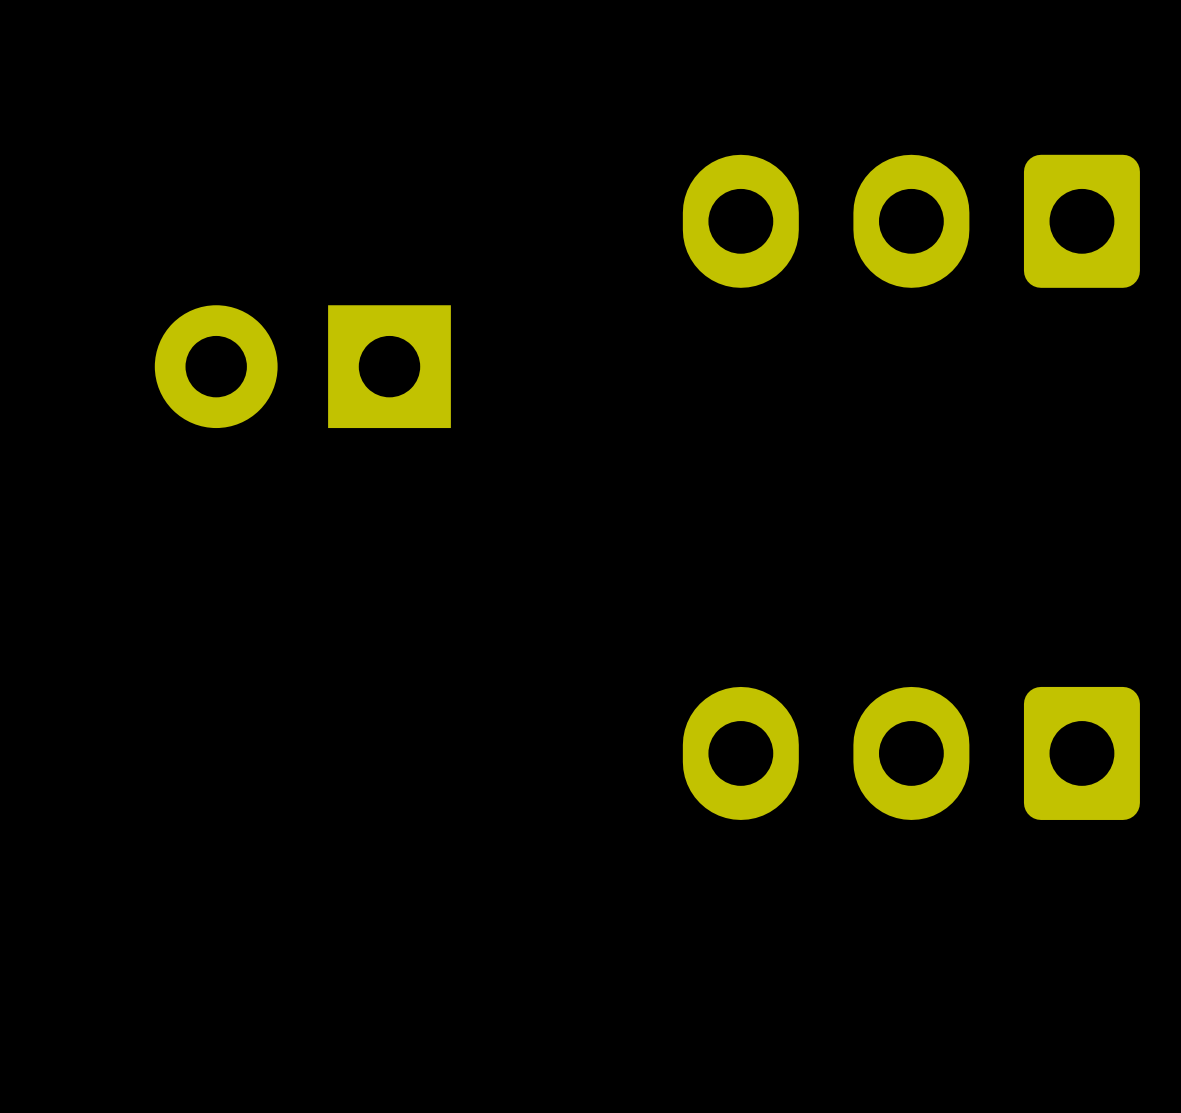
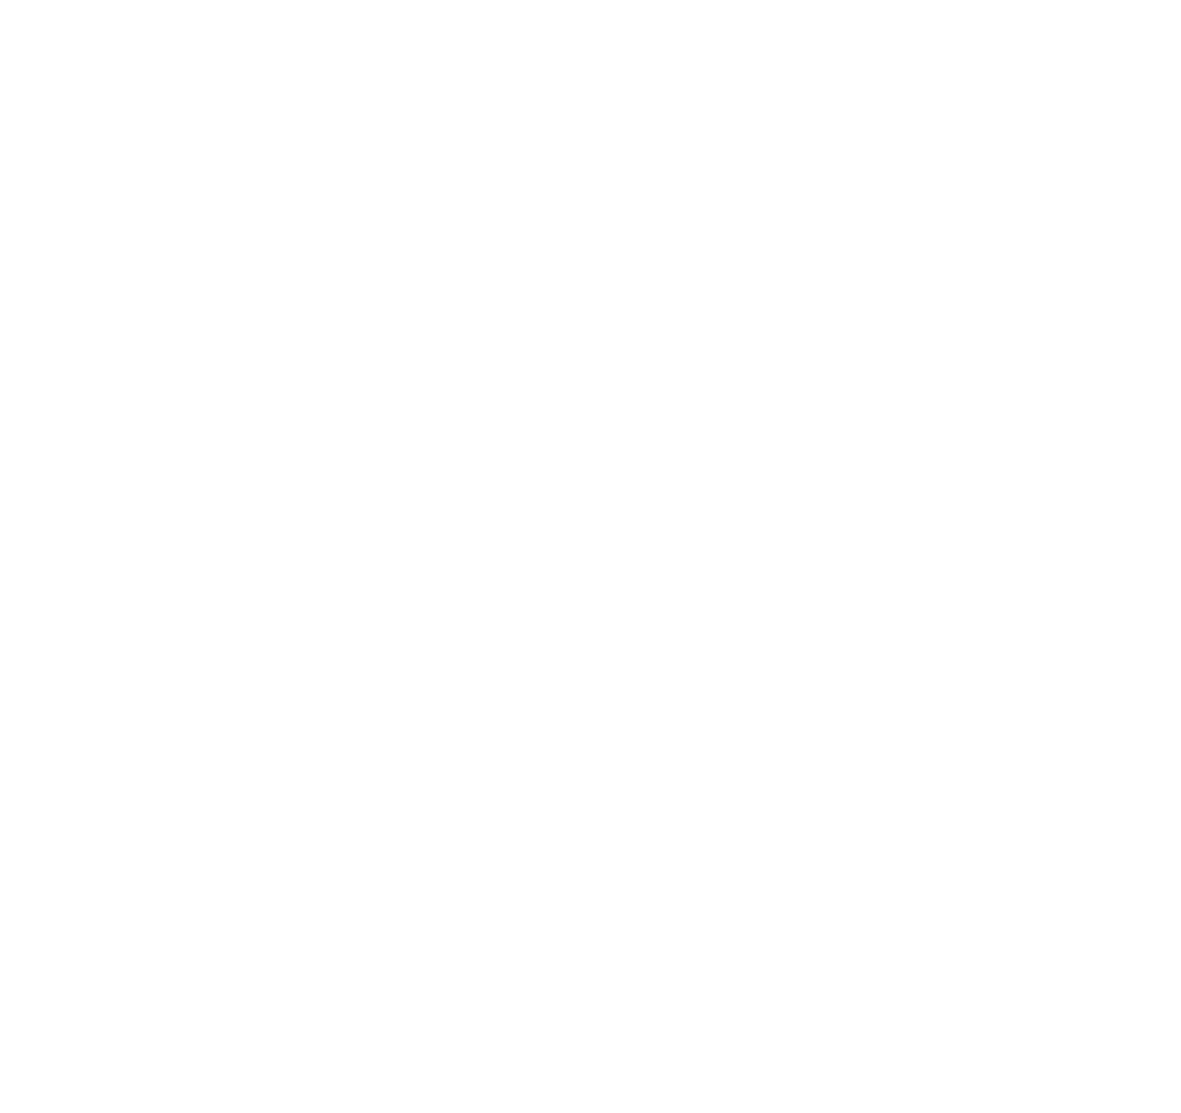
part: (911, 221) -> none
part: (302, 366) -> none
part: (911, 753) -> none

